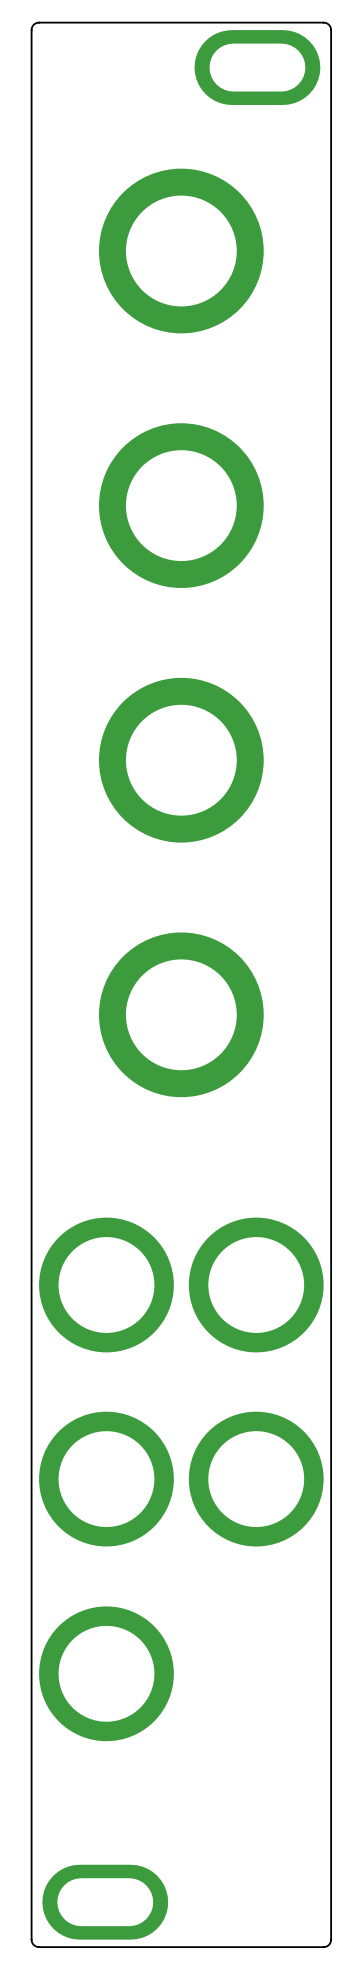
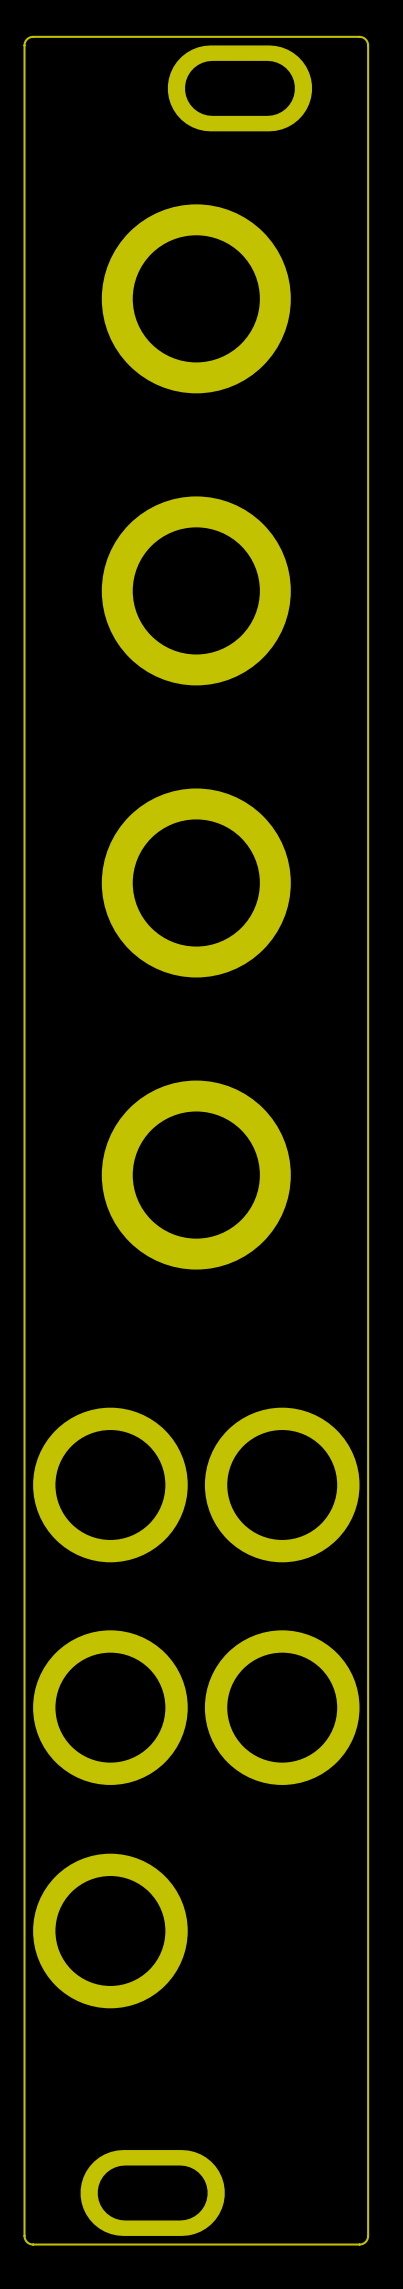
part footprint: [30, 21, 333, 1949] -> [23, 35, 370, 2246]

